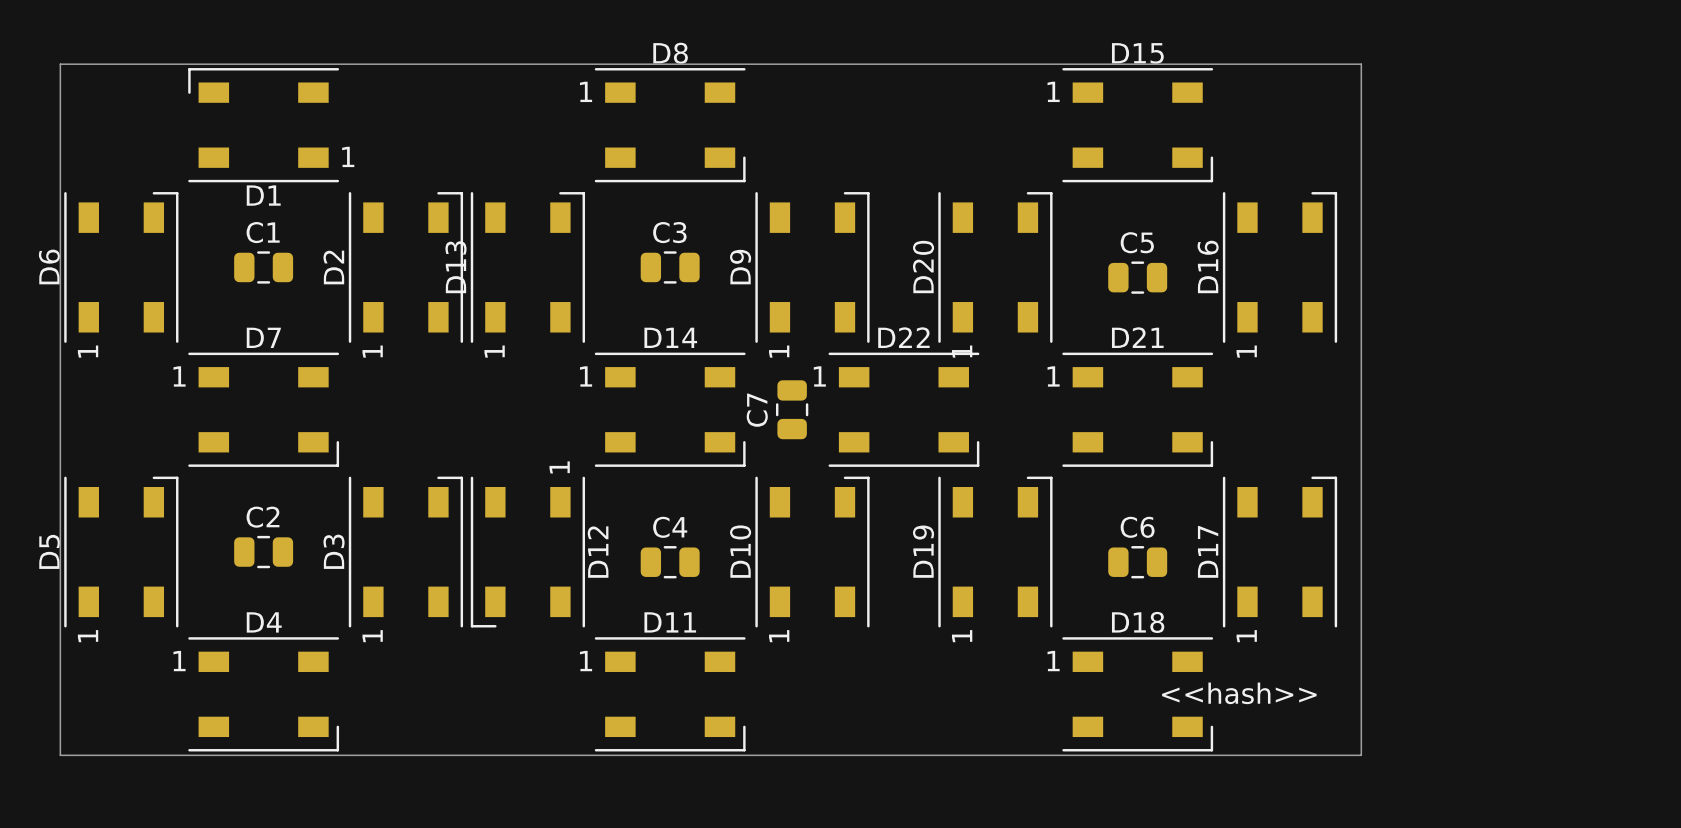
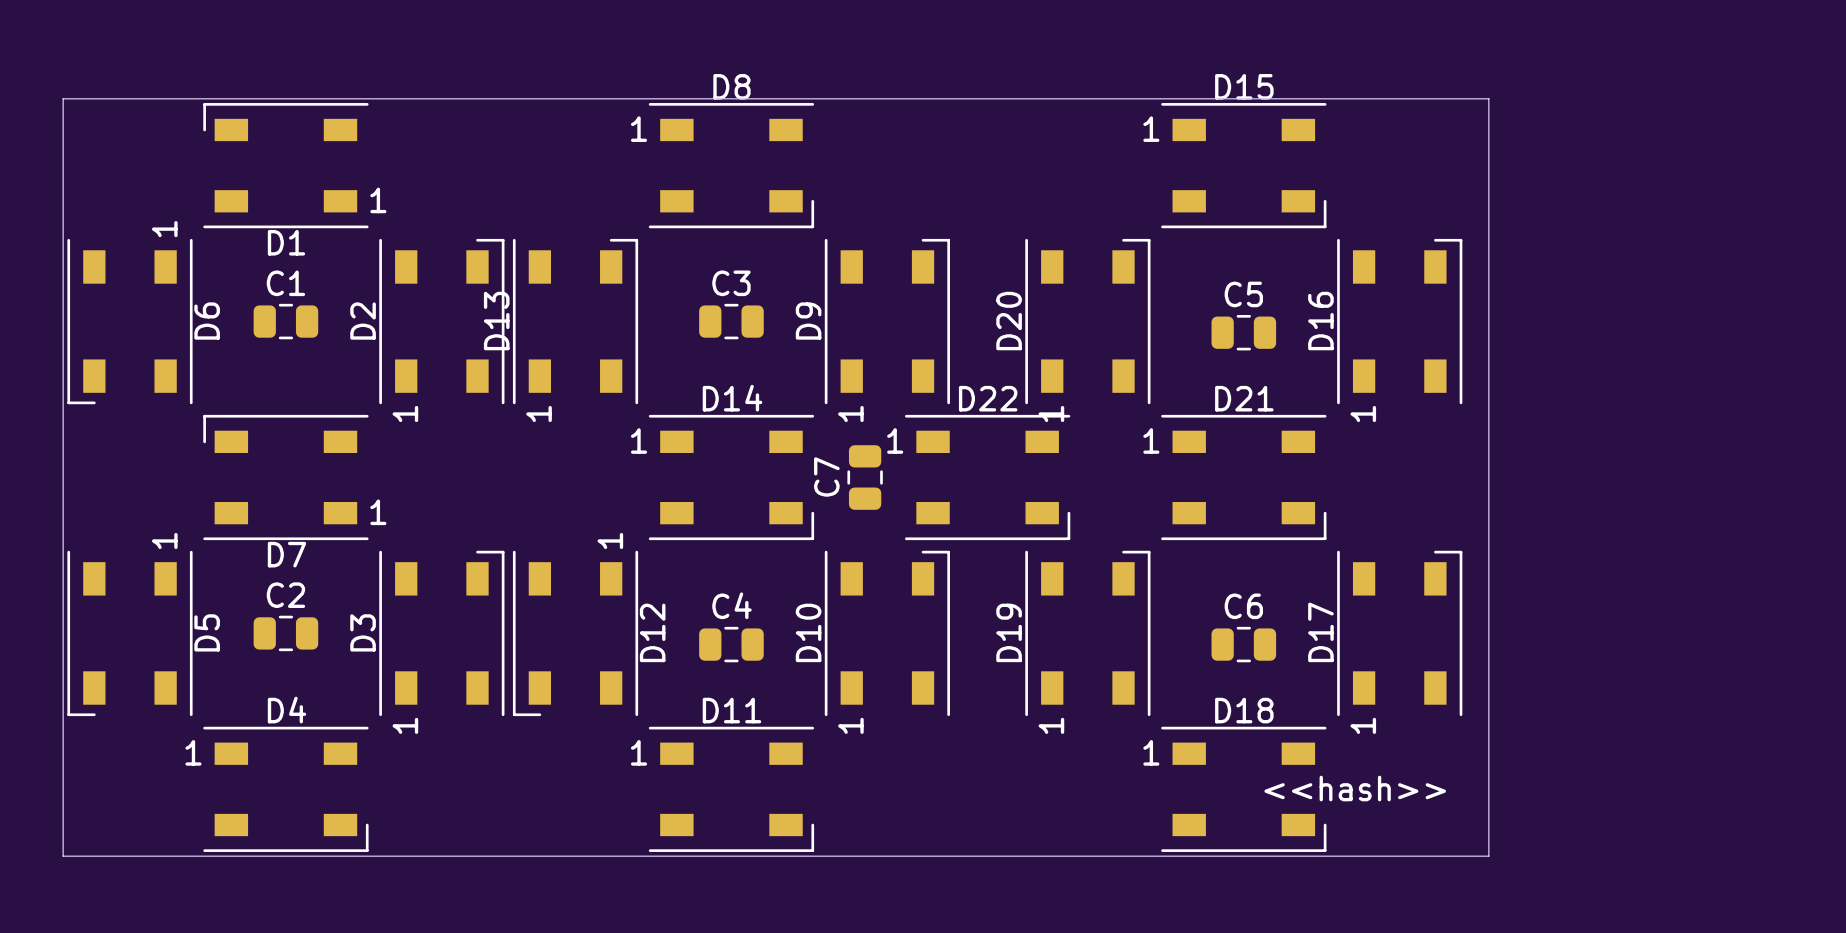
D6 rotation: 0° (121, 267) -> 180° (129, 321)
D7 rotation: 0° (263, 409) -> 180° (285, 477)
D5 rotation: 0° (121, 552) -> 180° (129, 633)

